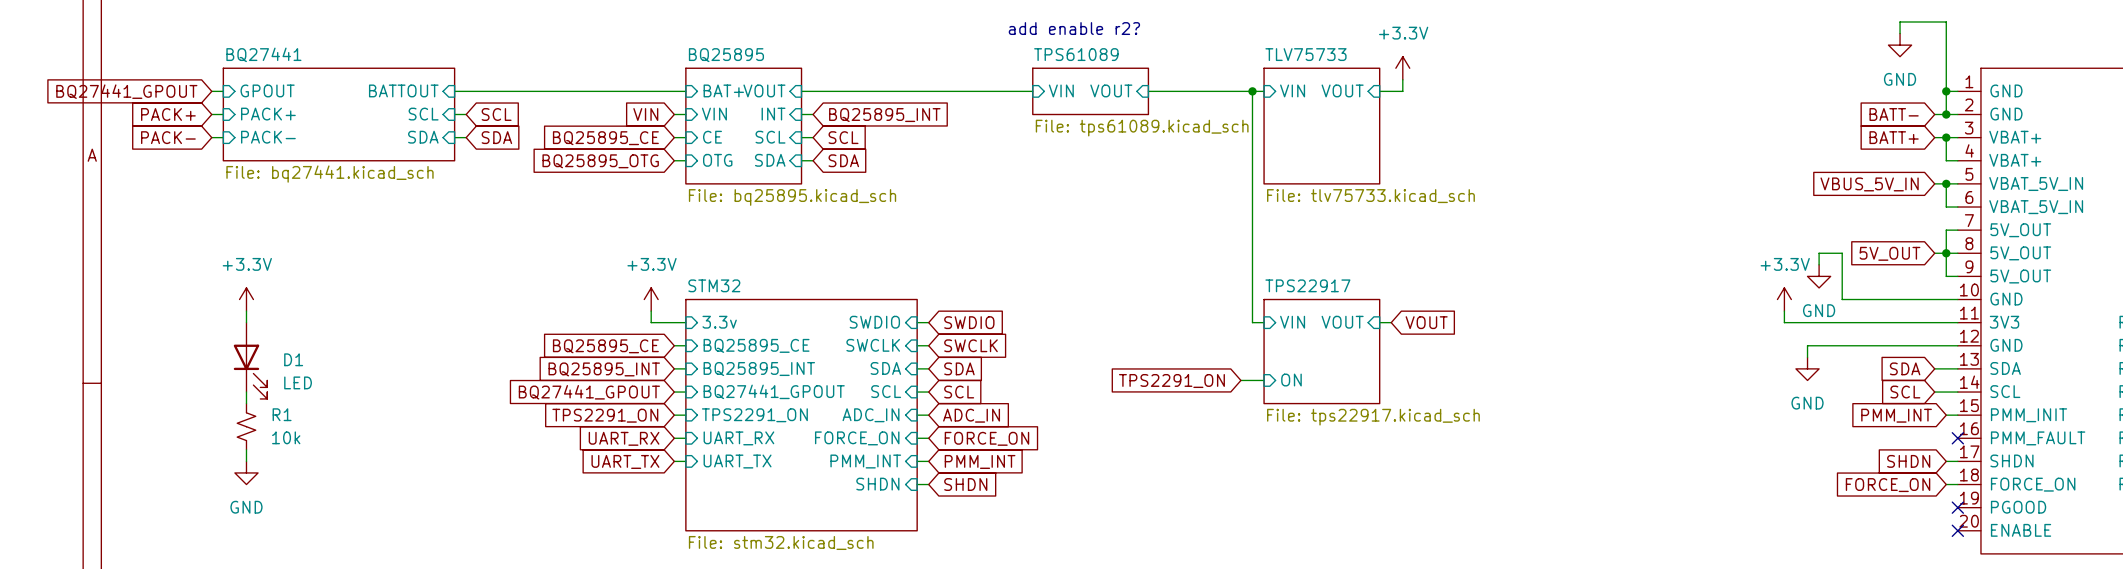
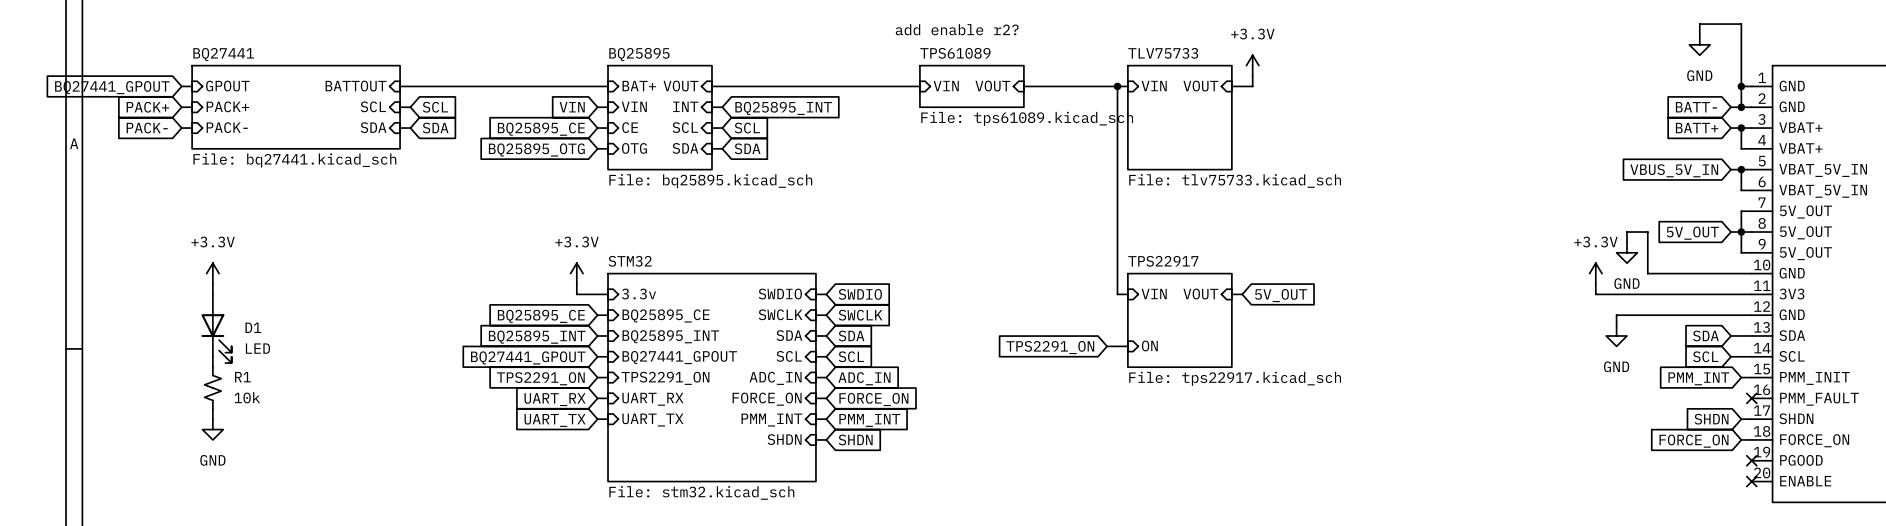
global label: VOUT (1426, 322) -> 5V_OUT (1281, 295)

